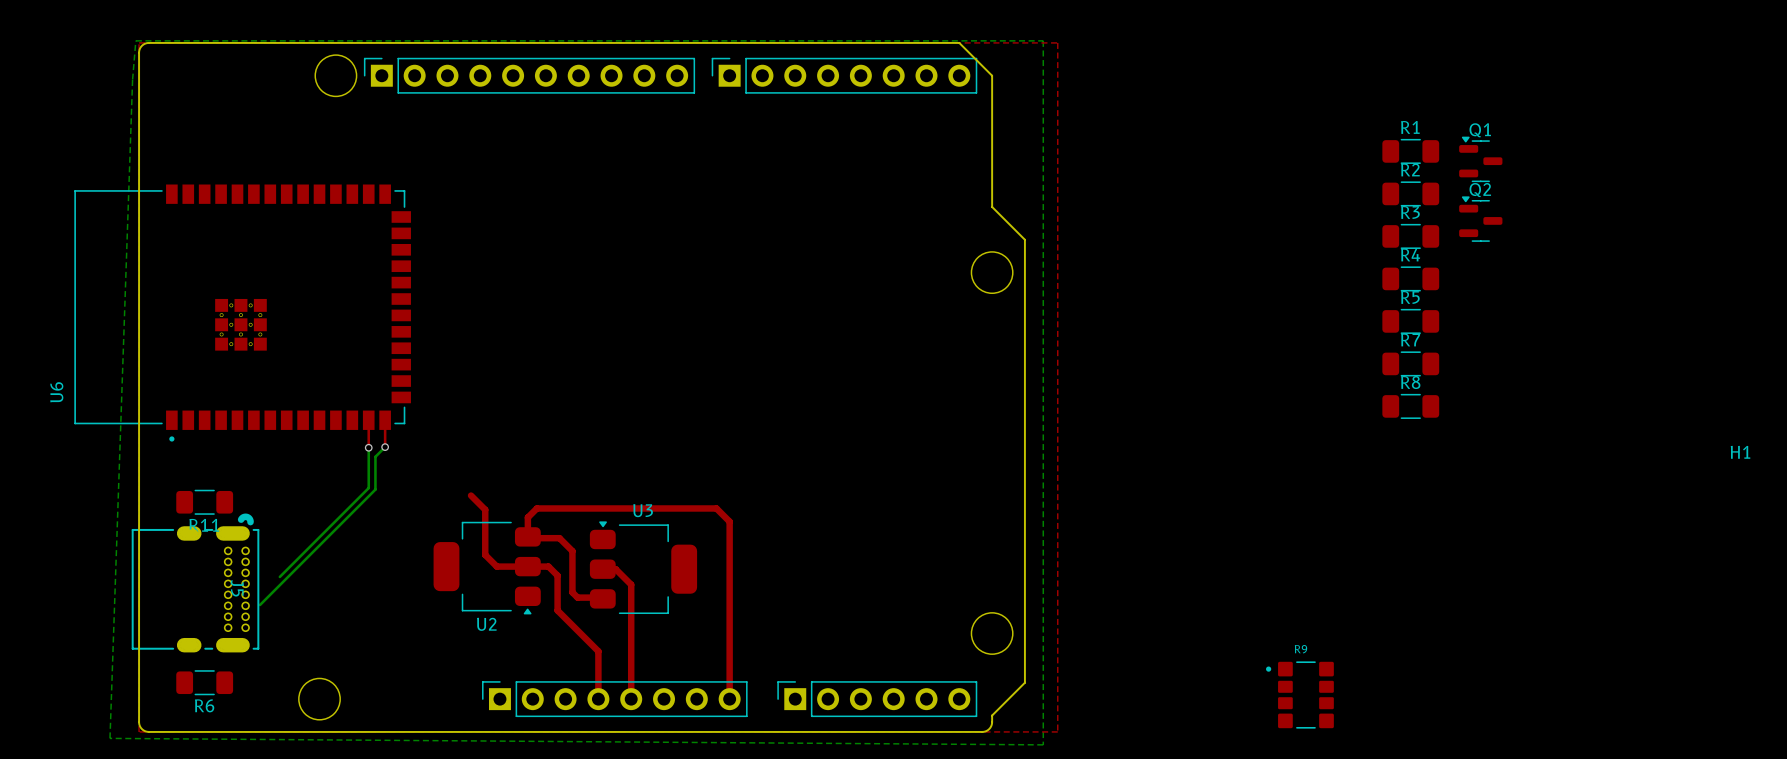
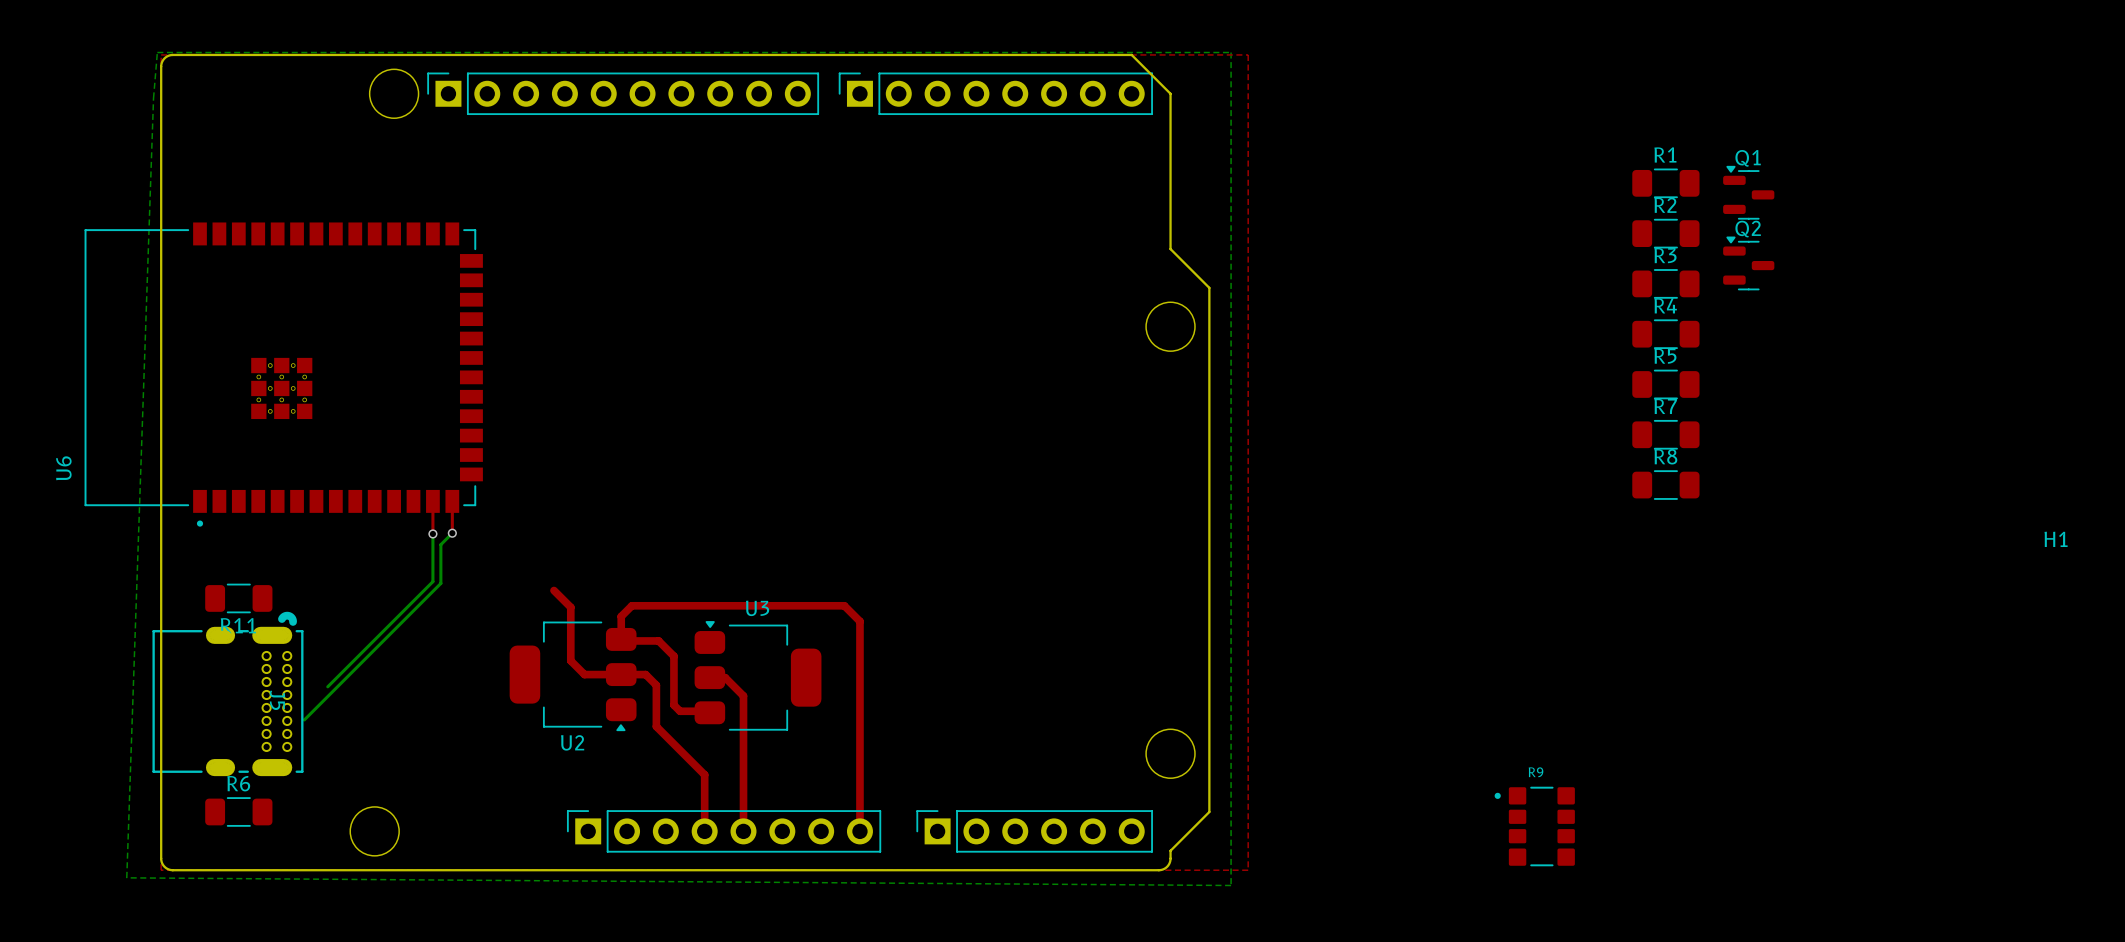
R6 name position: R6 (204, 705) -> R6 (238, 783)

